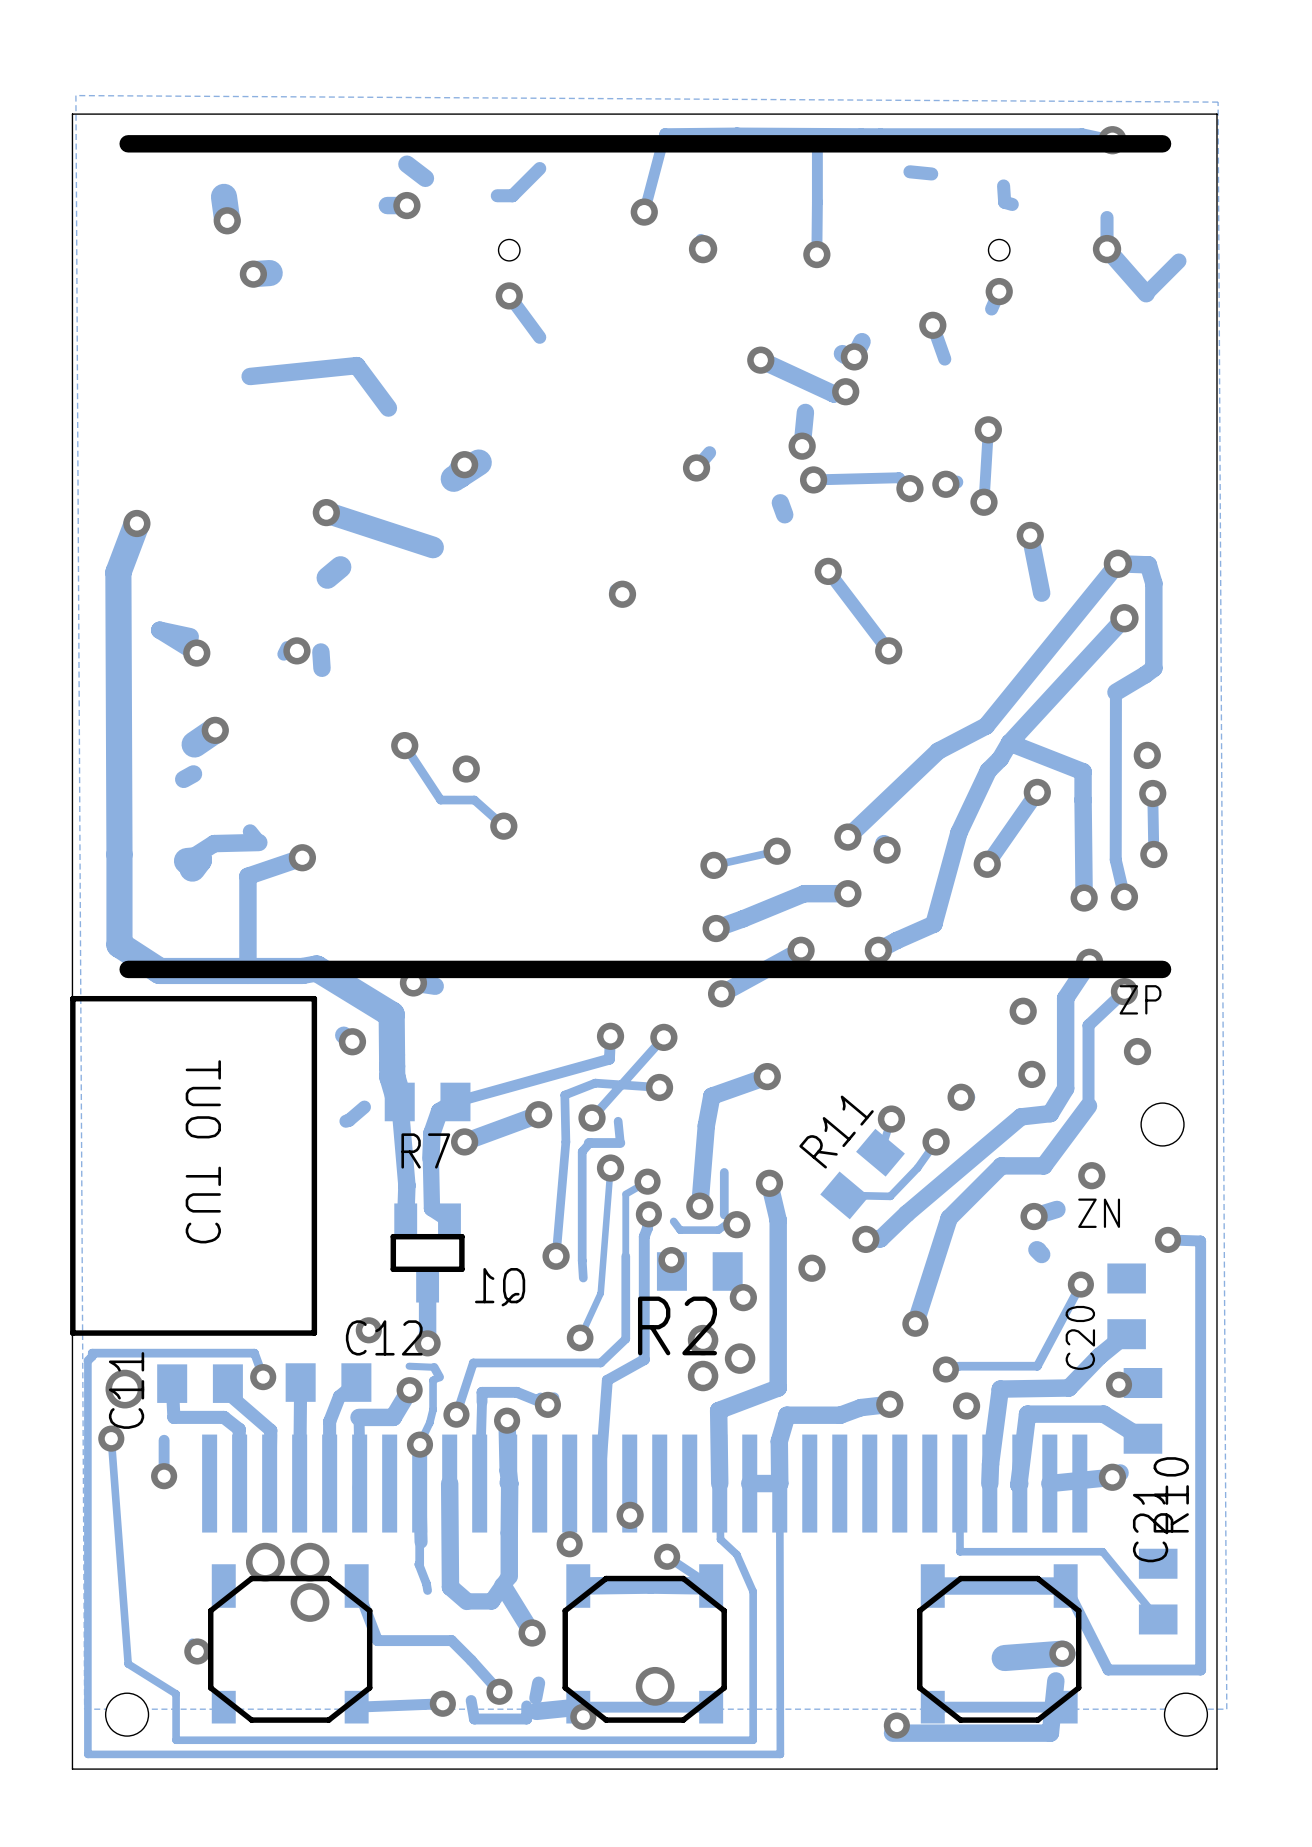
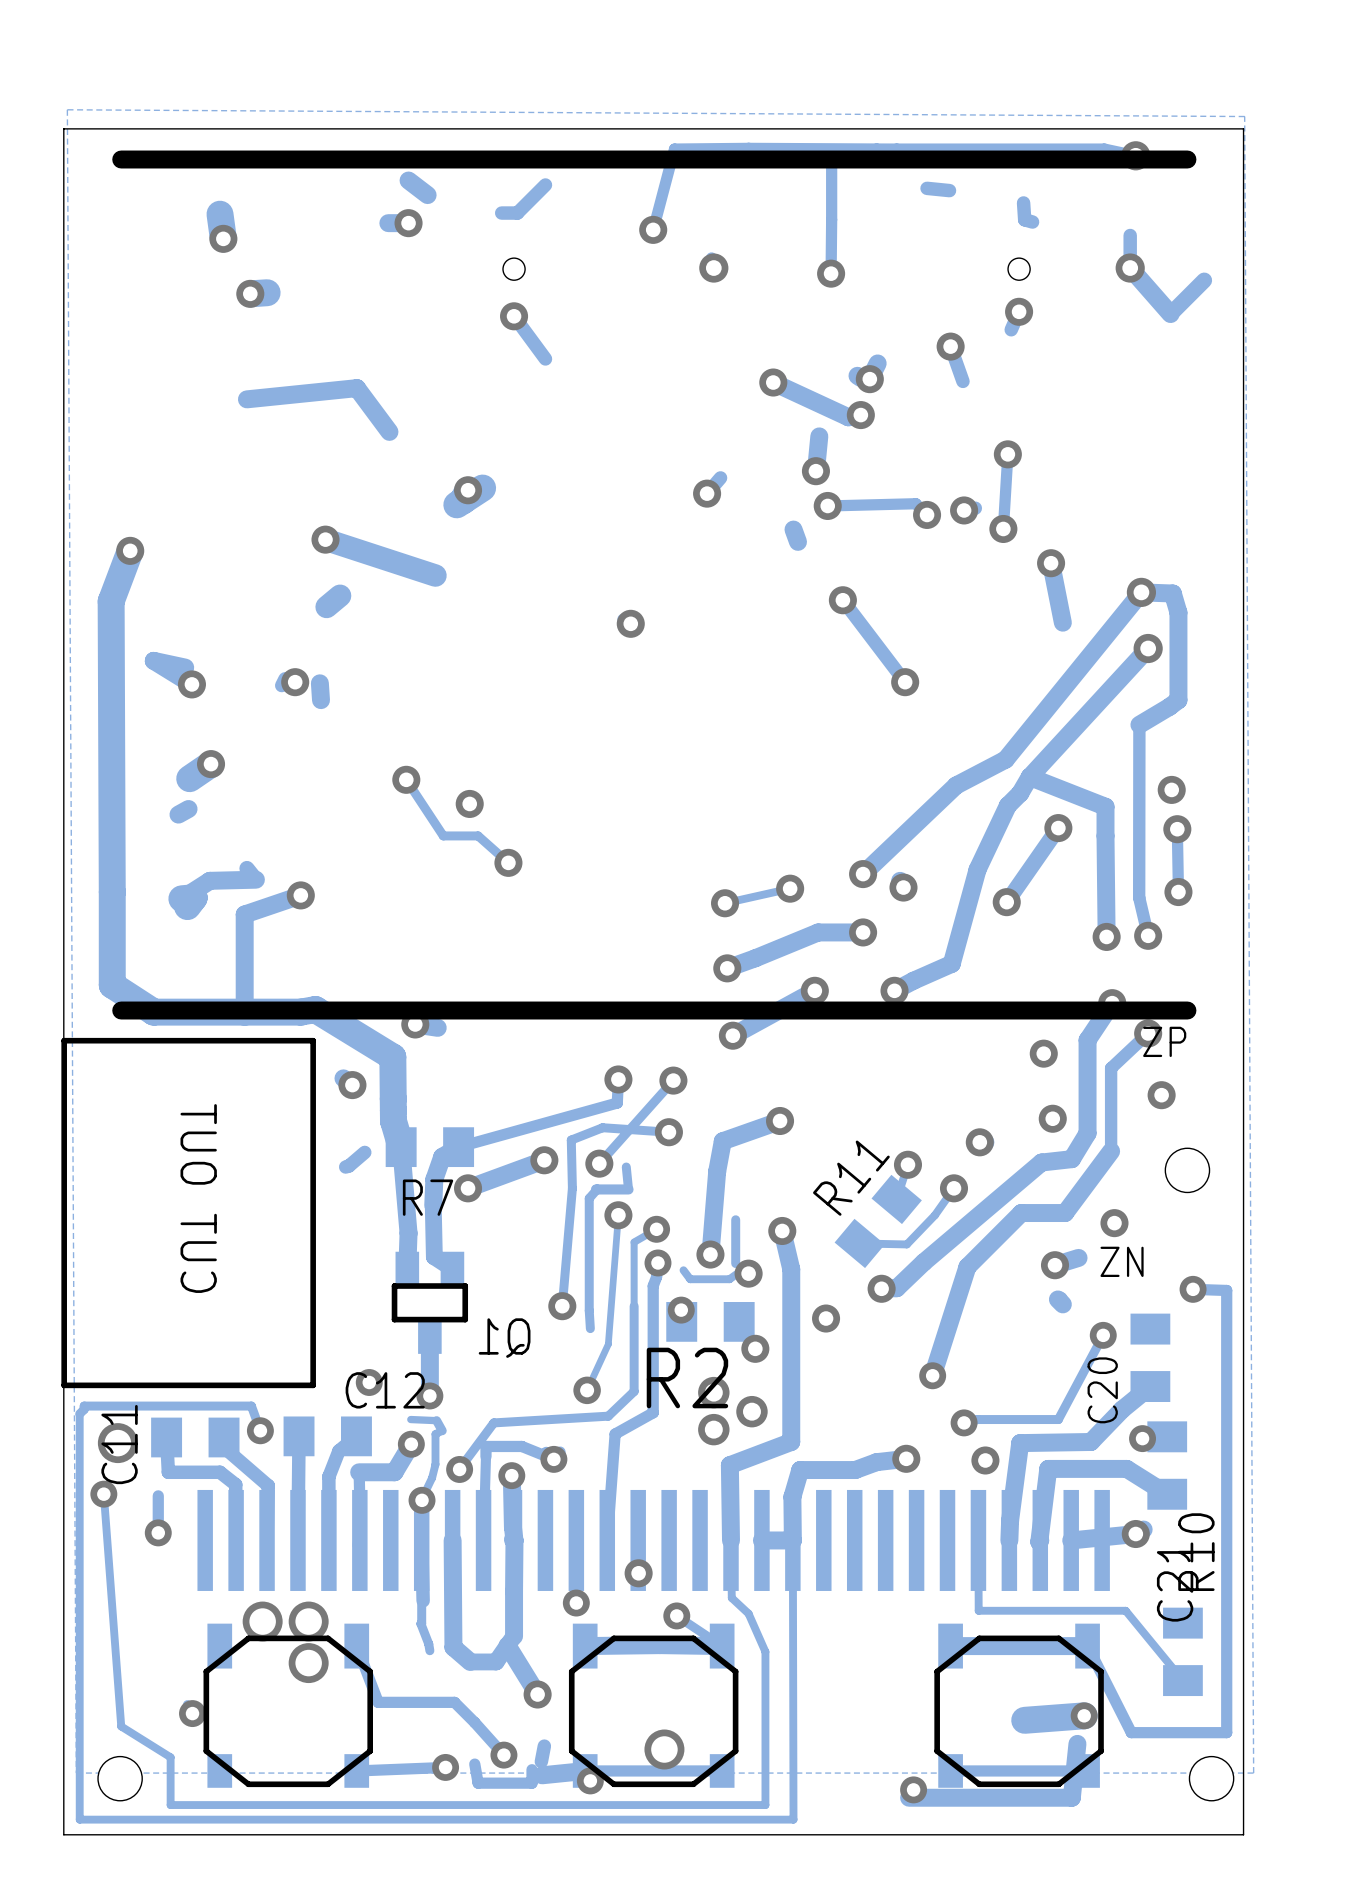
track: (600, 1362) (473, 1362) (456, 1414) -> (608, 1416) (493, 1422) (459, 1468)

